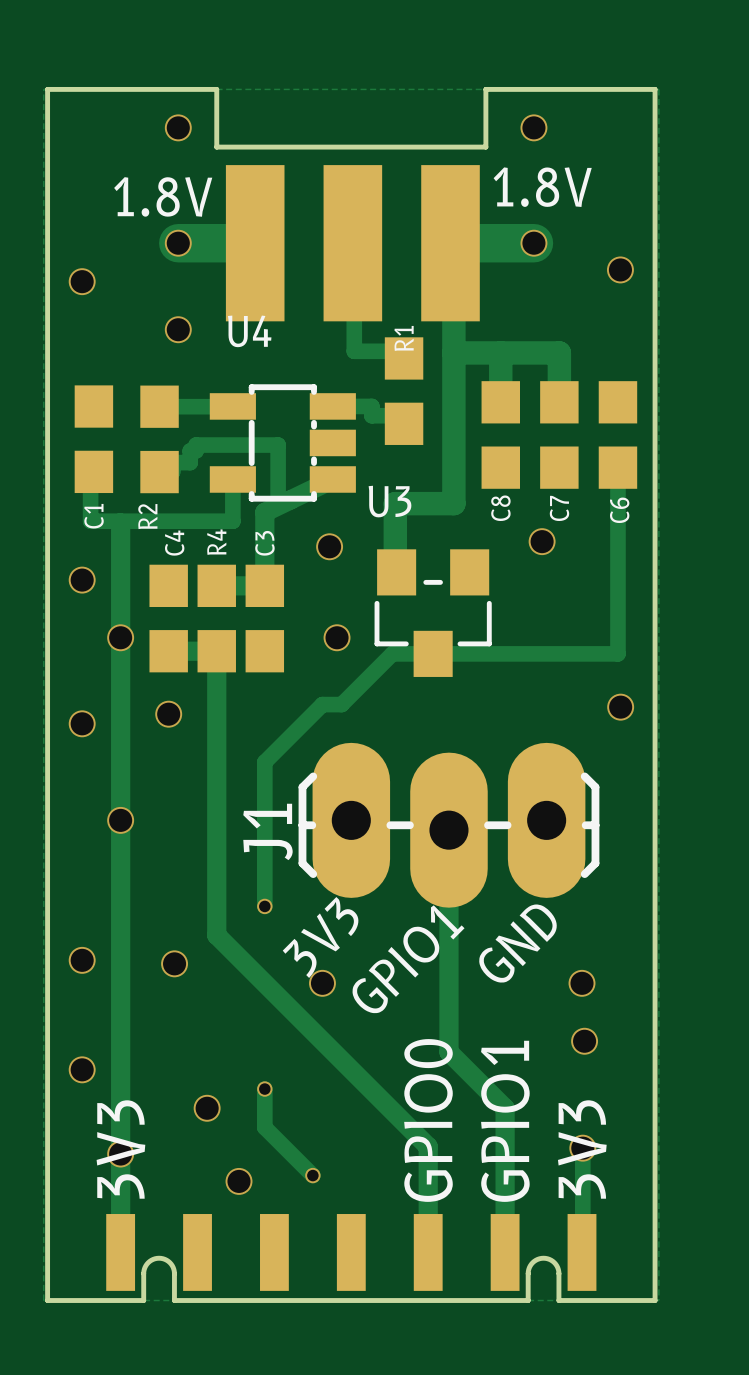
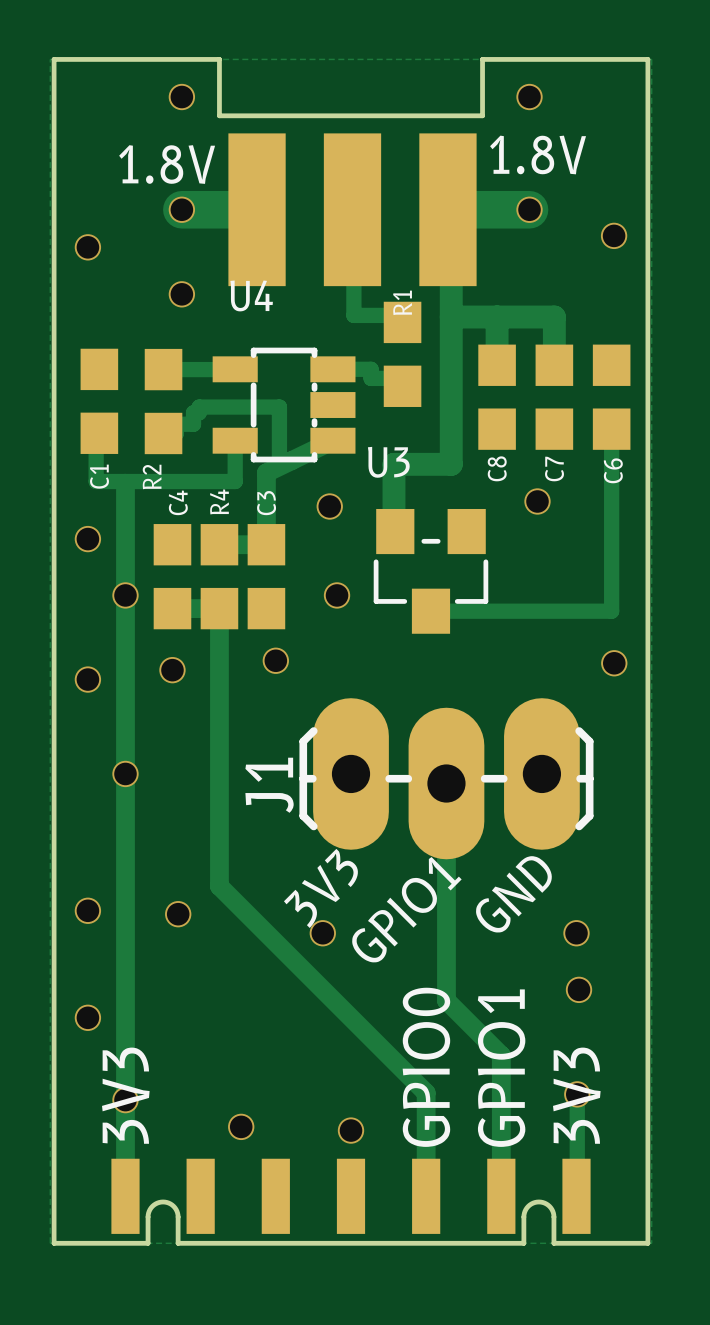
track: (433, 653) (392, 653) (341, 704) (322, 704) (264, 762) (264, 906) -> none
via: none -> (275, 660)
via: (264, 906) -> none
track: (264, 1089) (264, 1127) (312, 1175) -> none
via: (264, 1089) -> none
via position: (207, 1108) -> (350, 1130)
via: (312, 1175) -> none

